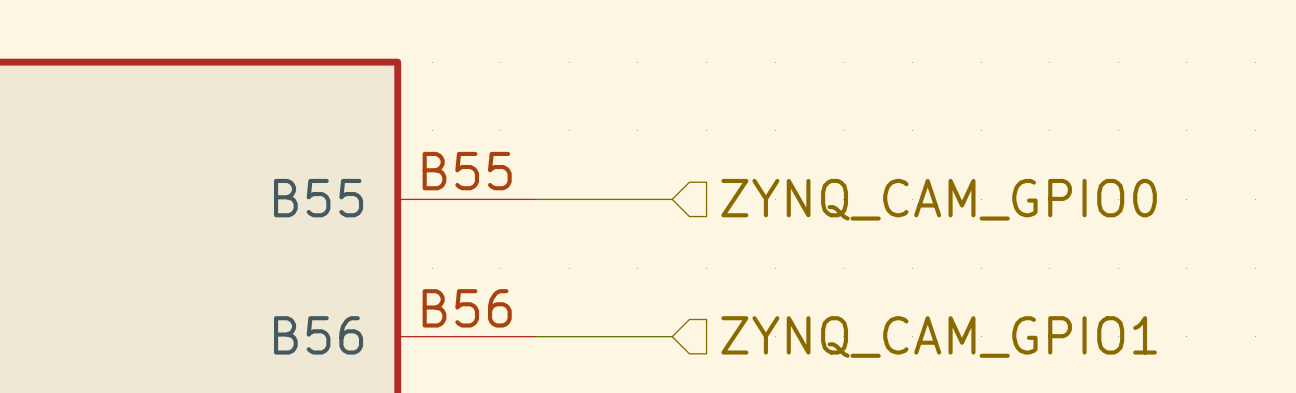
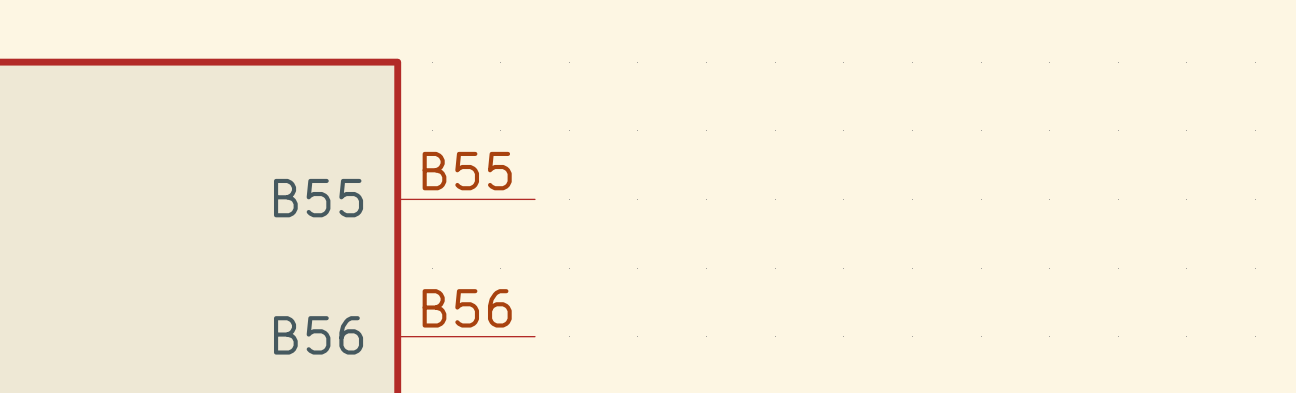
wire: (534, 199) (672, 199) -> none
hierarchical label: ZYNQ_CAM_GPIO0 (939, 199) -> none
wire: (534, 336) (672, 336) -> none
hierarchical label: ZYNQ_CAM_GPIO1 (939, 337) -> none

